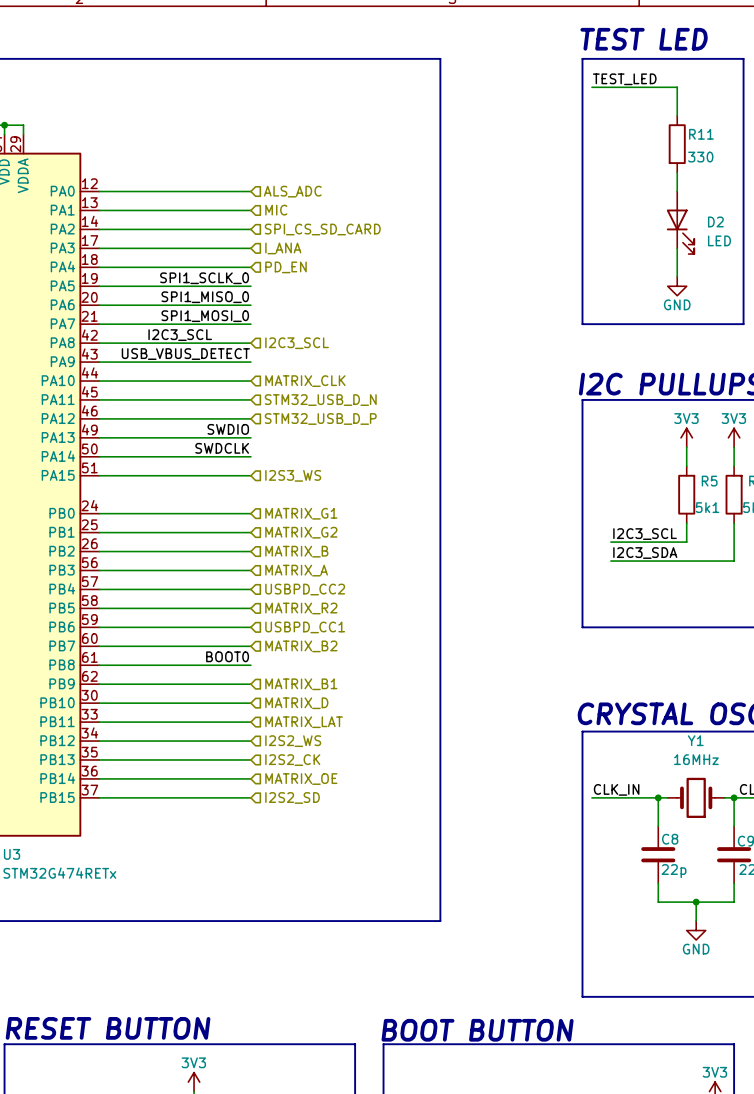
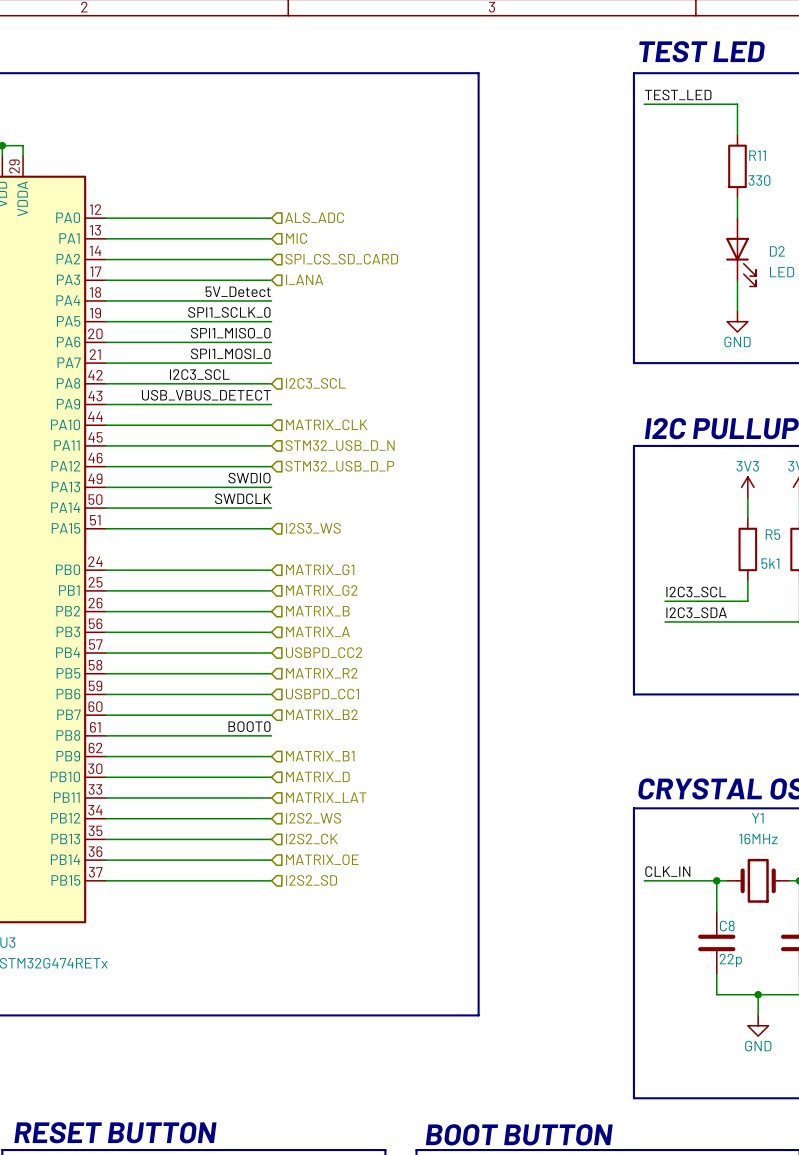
label: none -> 5V_Detect (238, 291)
hierarchical label: PD_EN (285, 267) -> none

